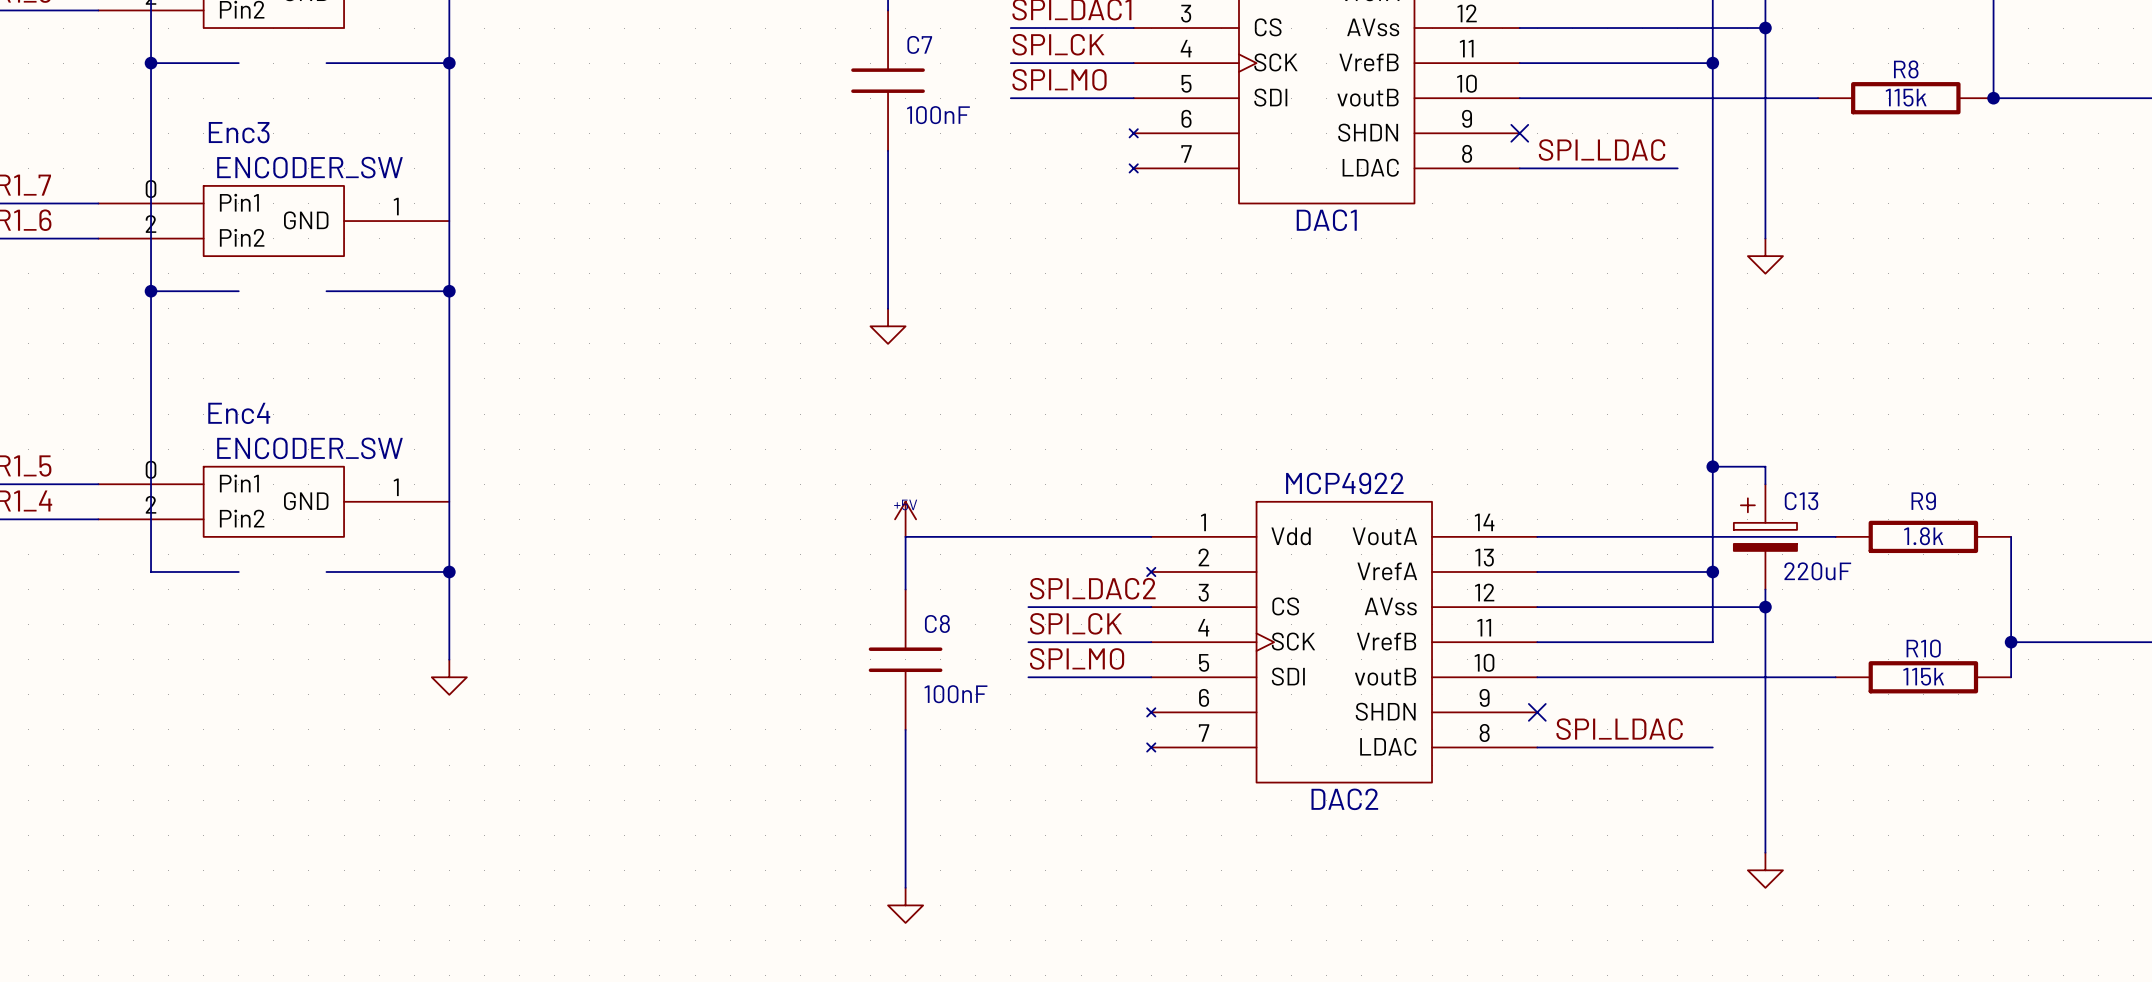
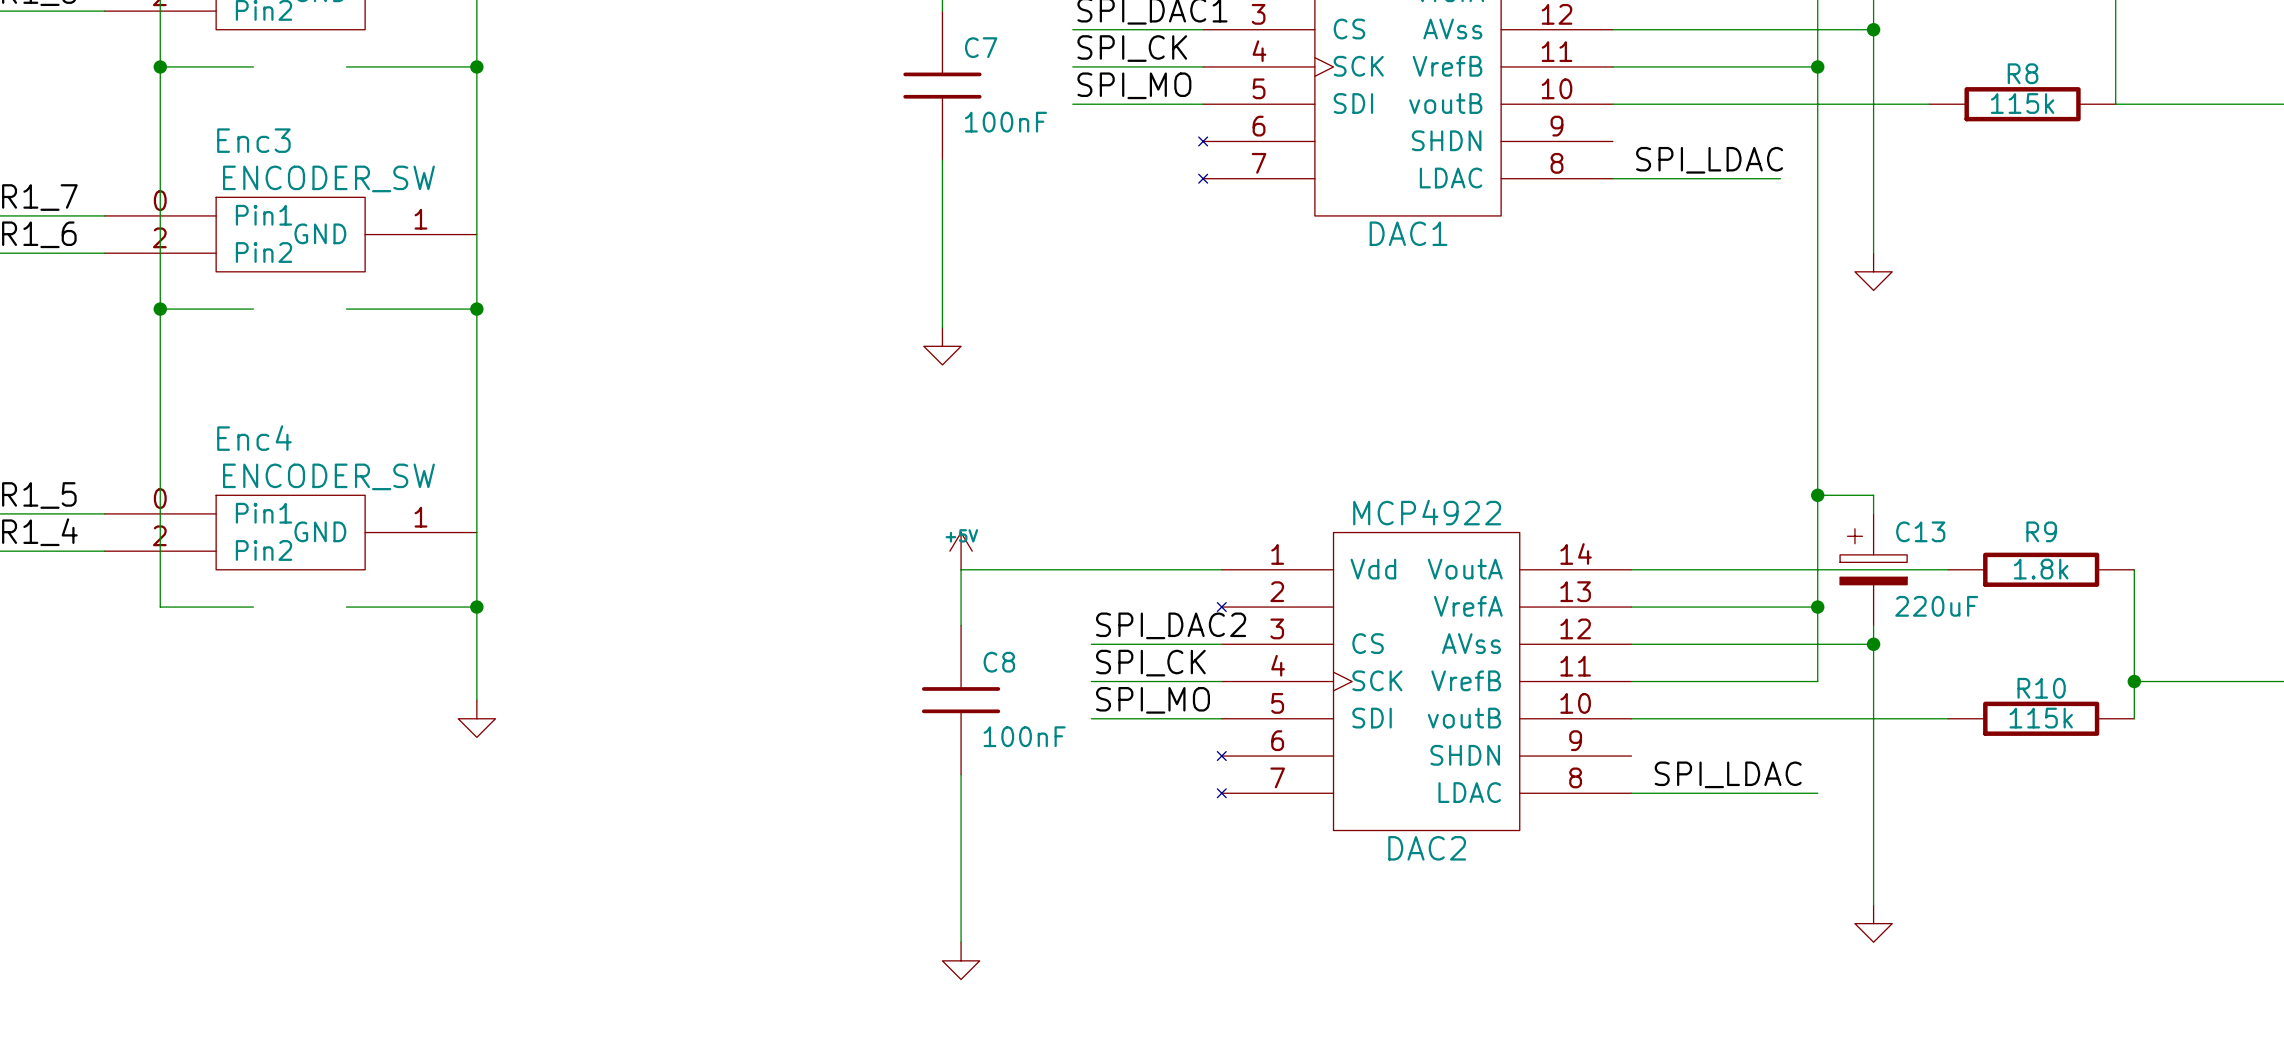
junction: (1993, 98) -> none
no-connect mark: (1519, 133) -> none
no-connect mark: (1537, 712) -> none

